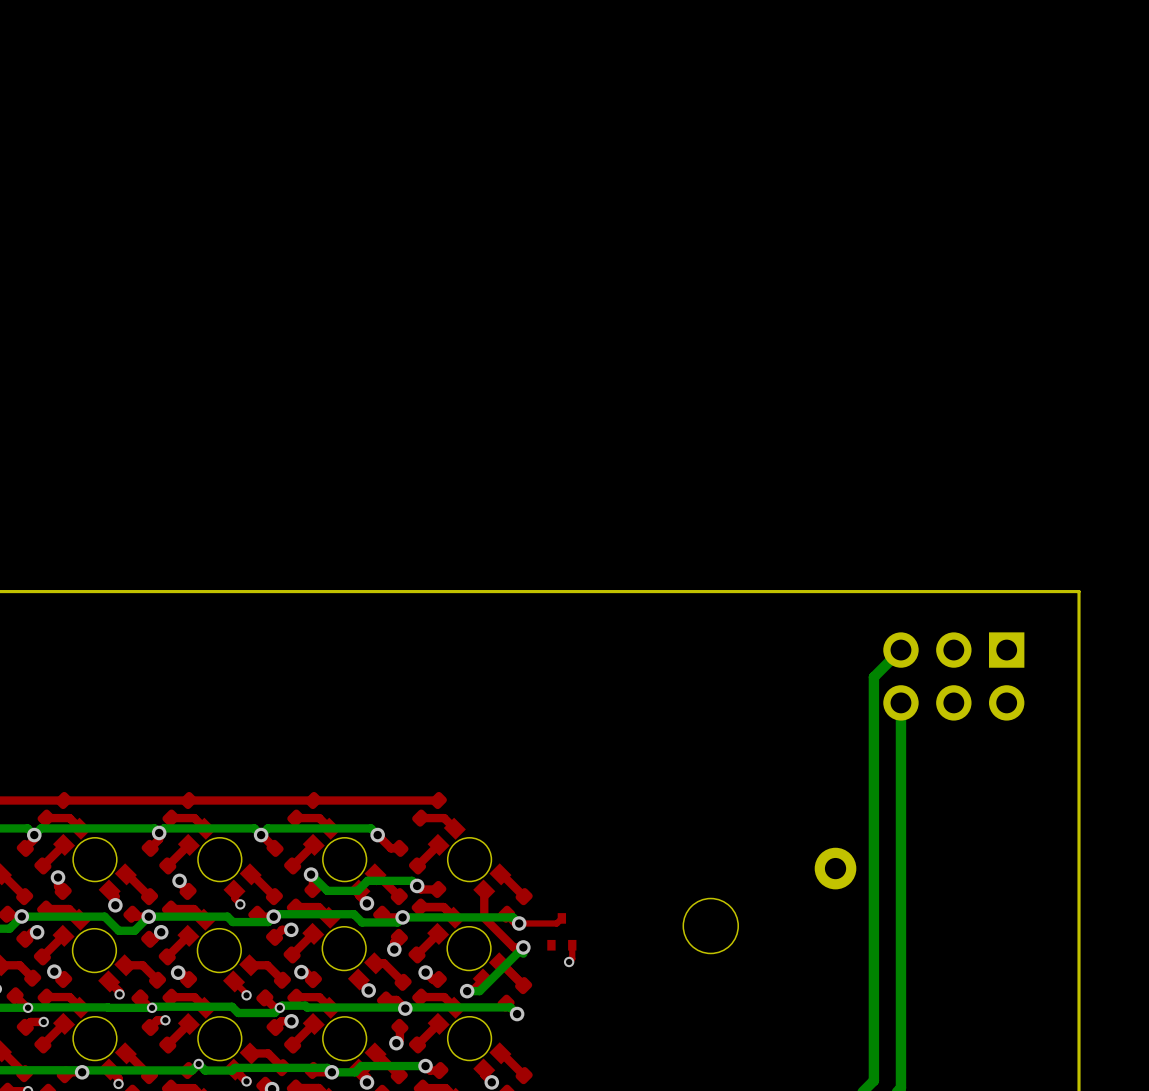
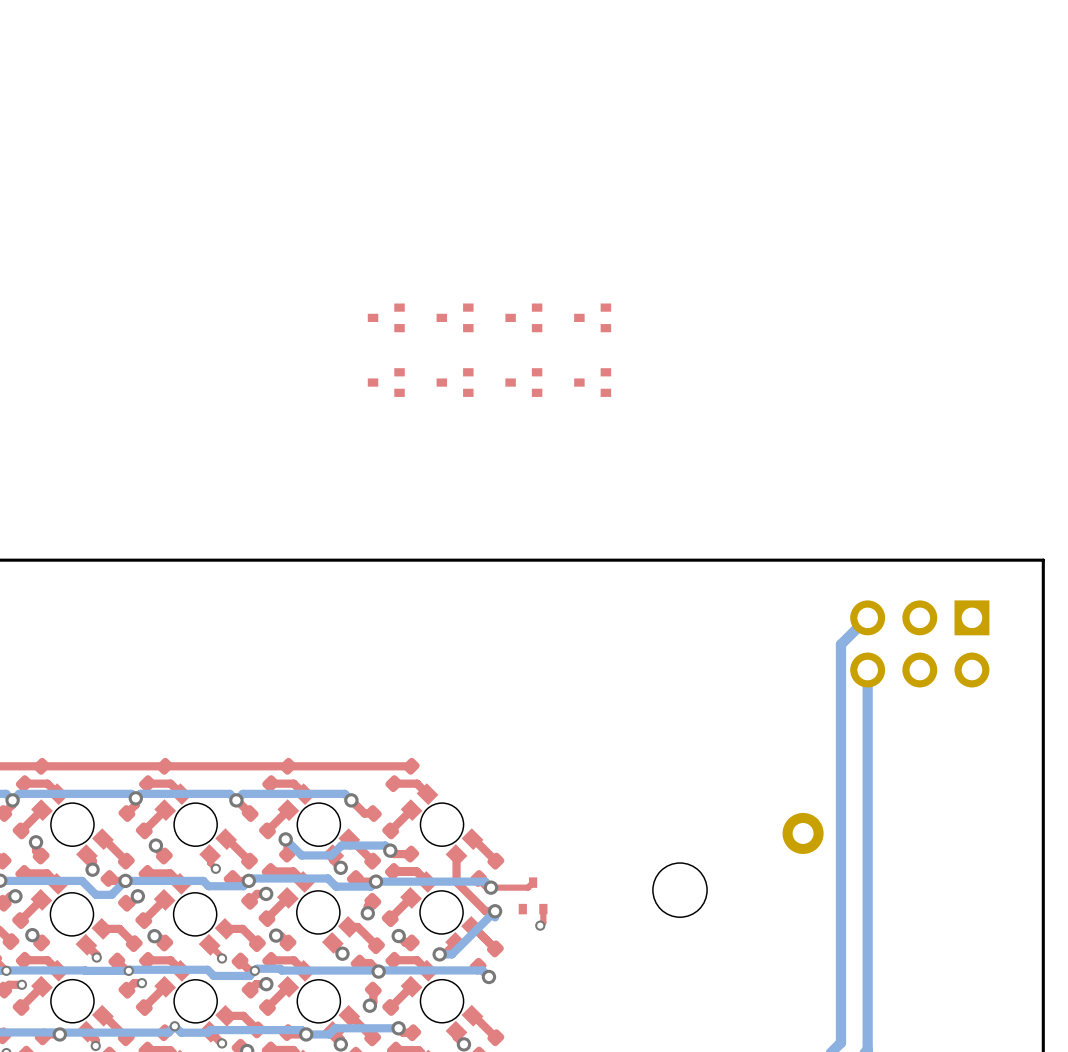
part: none -> (386, 317)
part: none -> (455, 317)
part: none -> (523, 317)
part: none -> (592, 317)
part: none -> (386, 382)
part: none -> (455, 382)
part: none -> (523, 382)
part: none -> (592, 382)

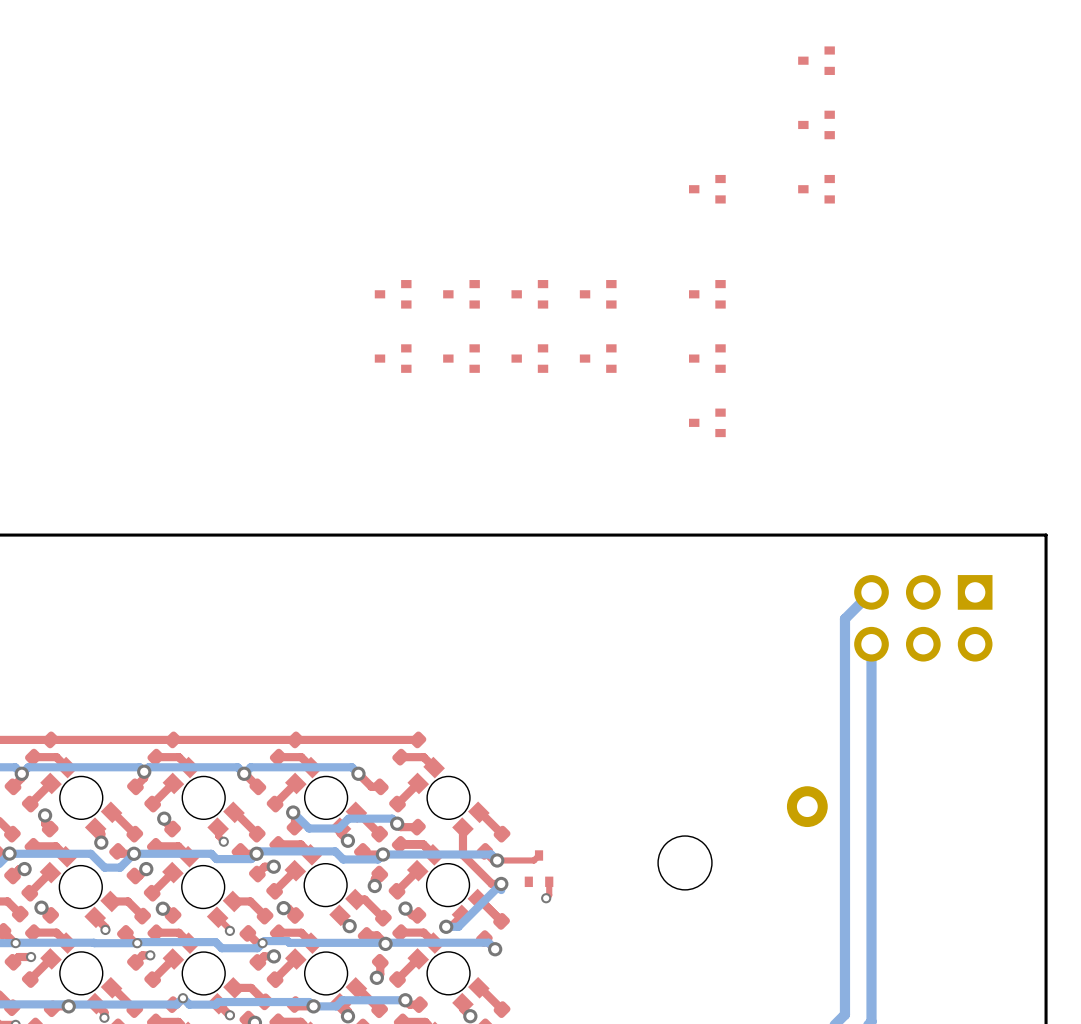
part: none -> (816, 60)
part: none -> (816, 124)
part: none -> (707, 189)
part: none -> (816, 189)
part: none -> (707, 294)
part: none -> (707, 358)
part: none -> (707, 422)

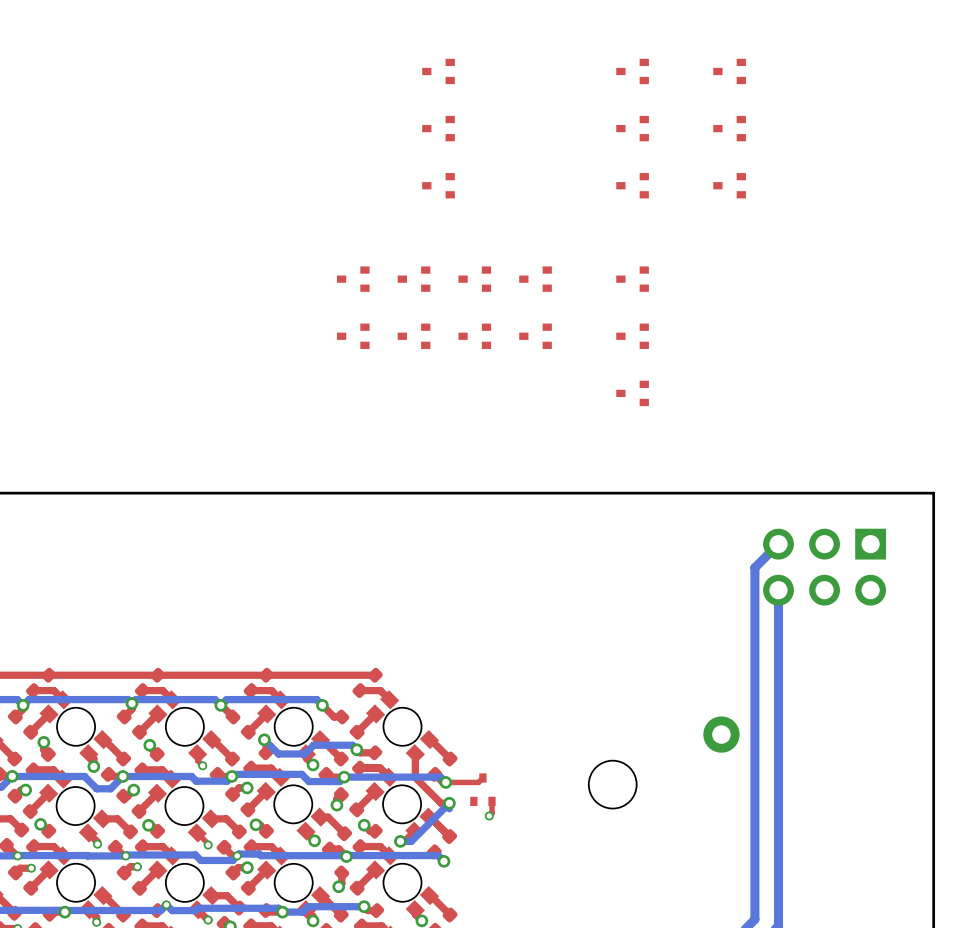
part: none -> (438, 71)
part: none -> (632, 71)
part: none -> (438, 128)
part: none -> (632, 128)
part: none -> (438, 185)

